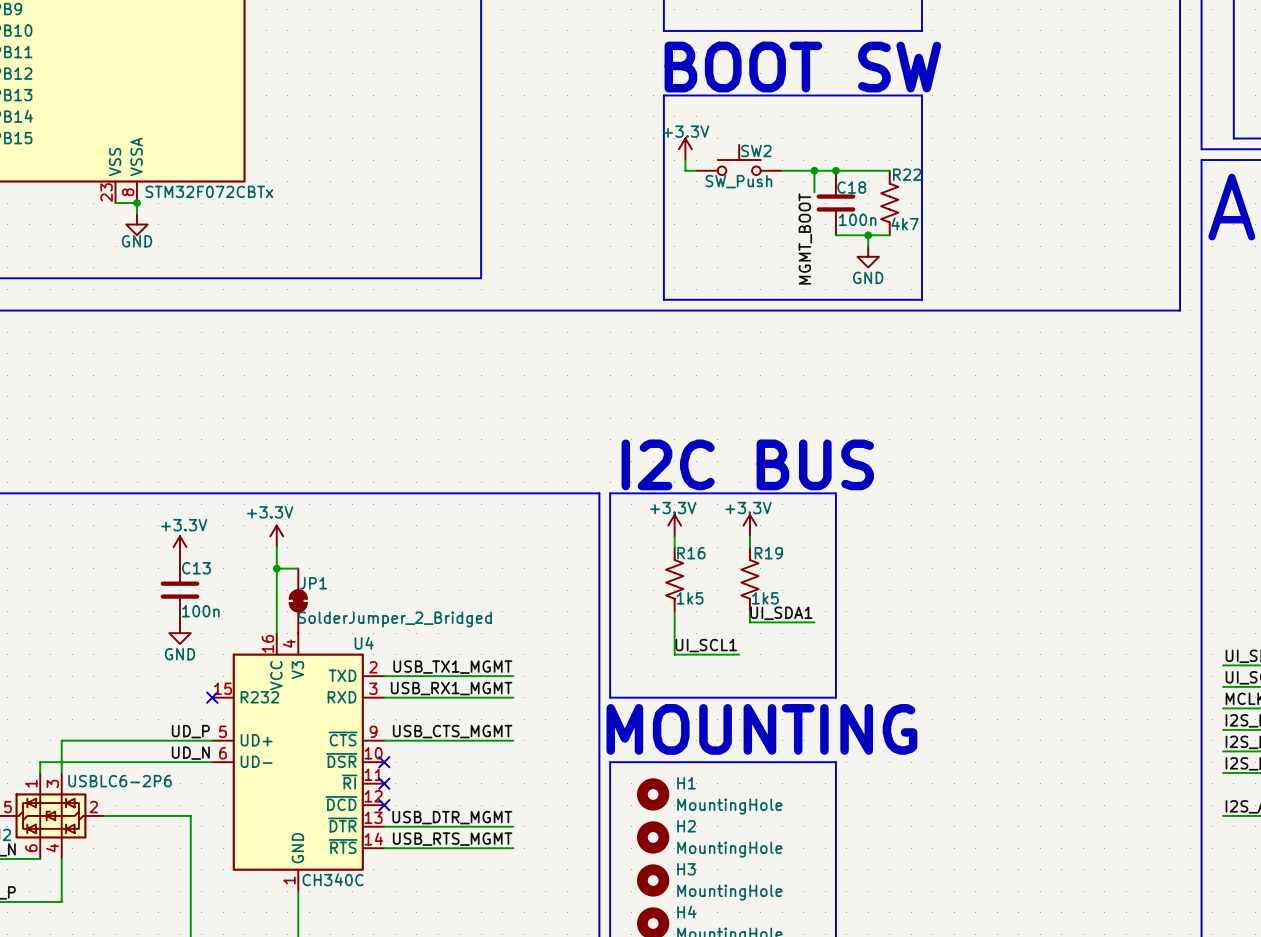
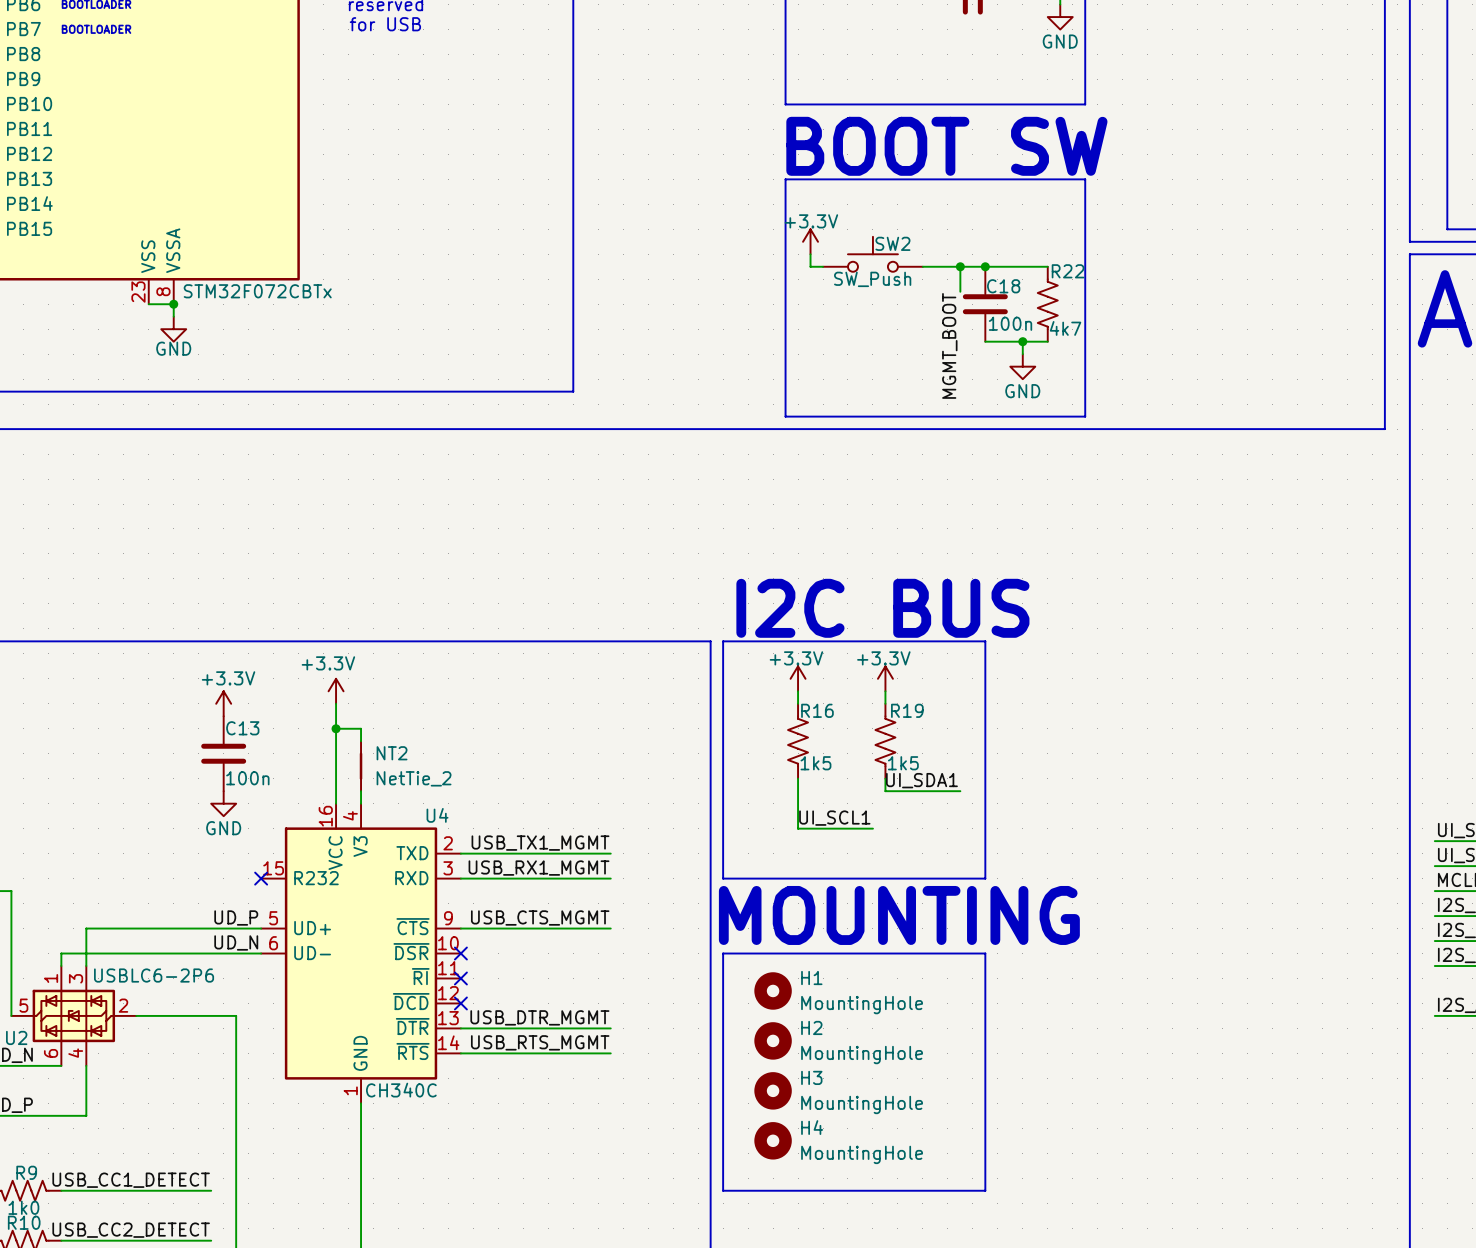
JP1: SolderJumper_2_Bridged (298, 600) -> none
NT2: none -> NetTie_2 (361, 766)

